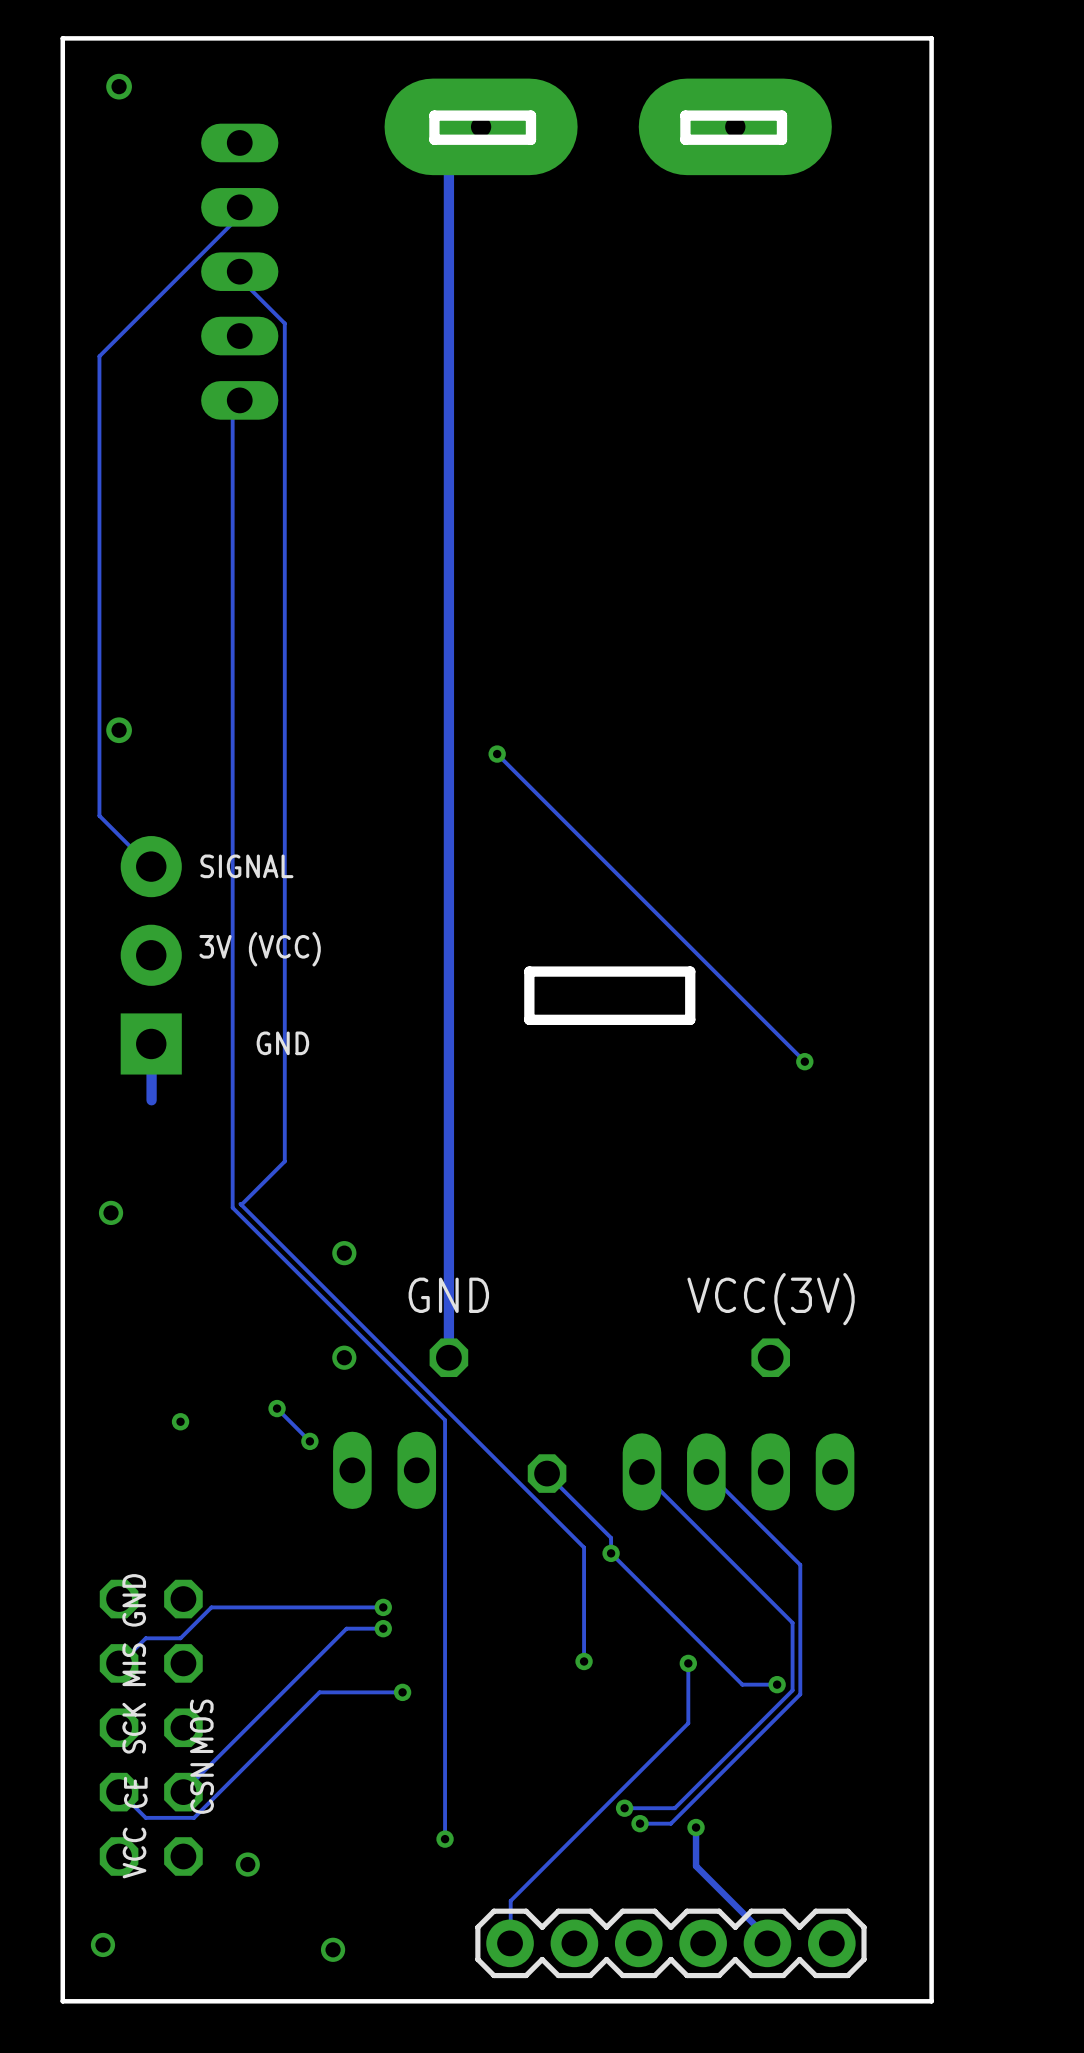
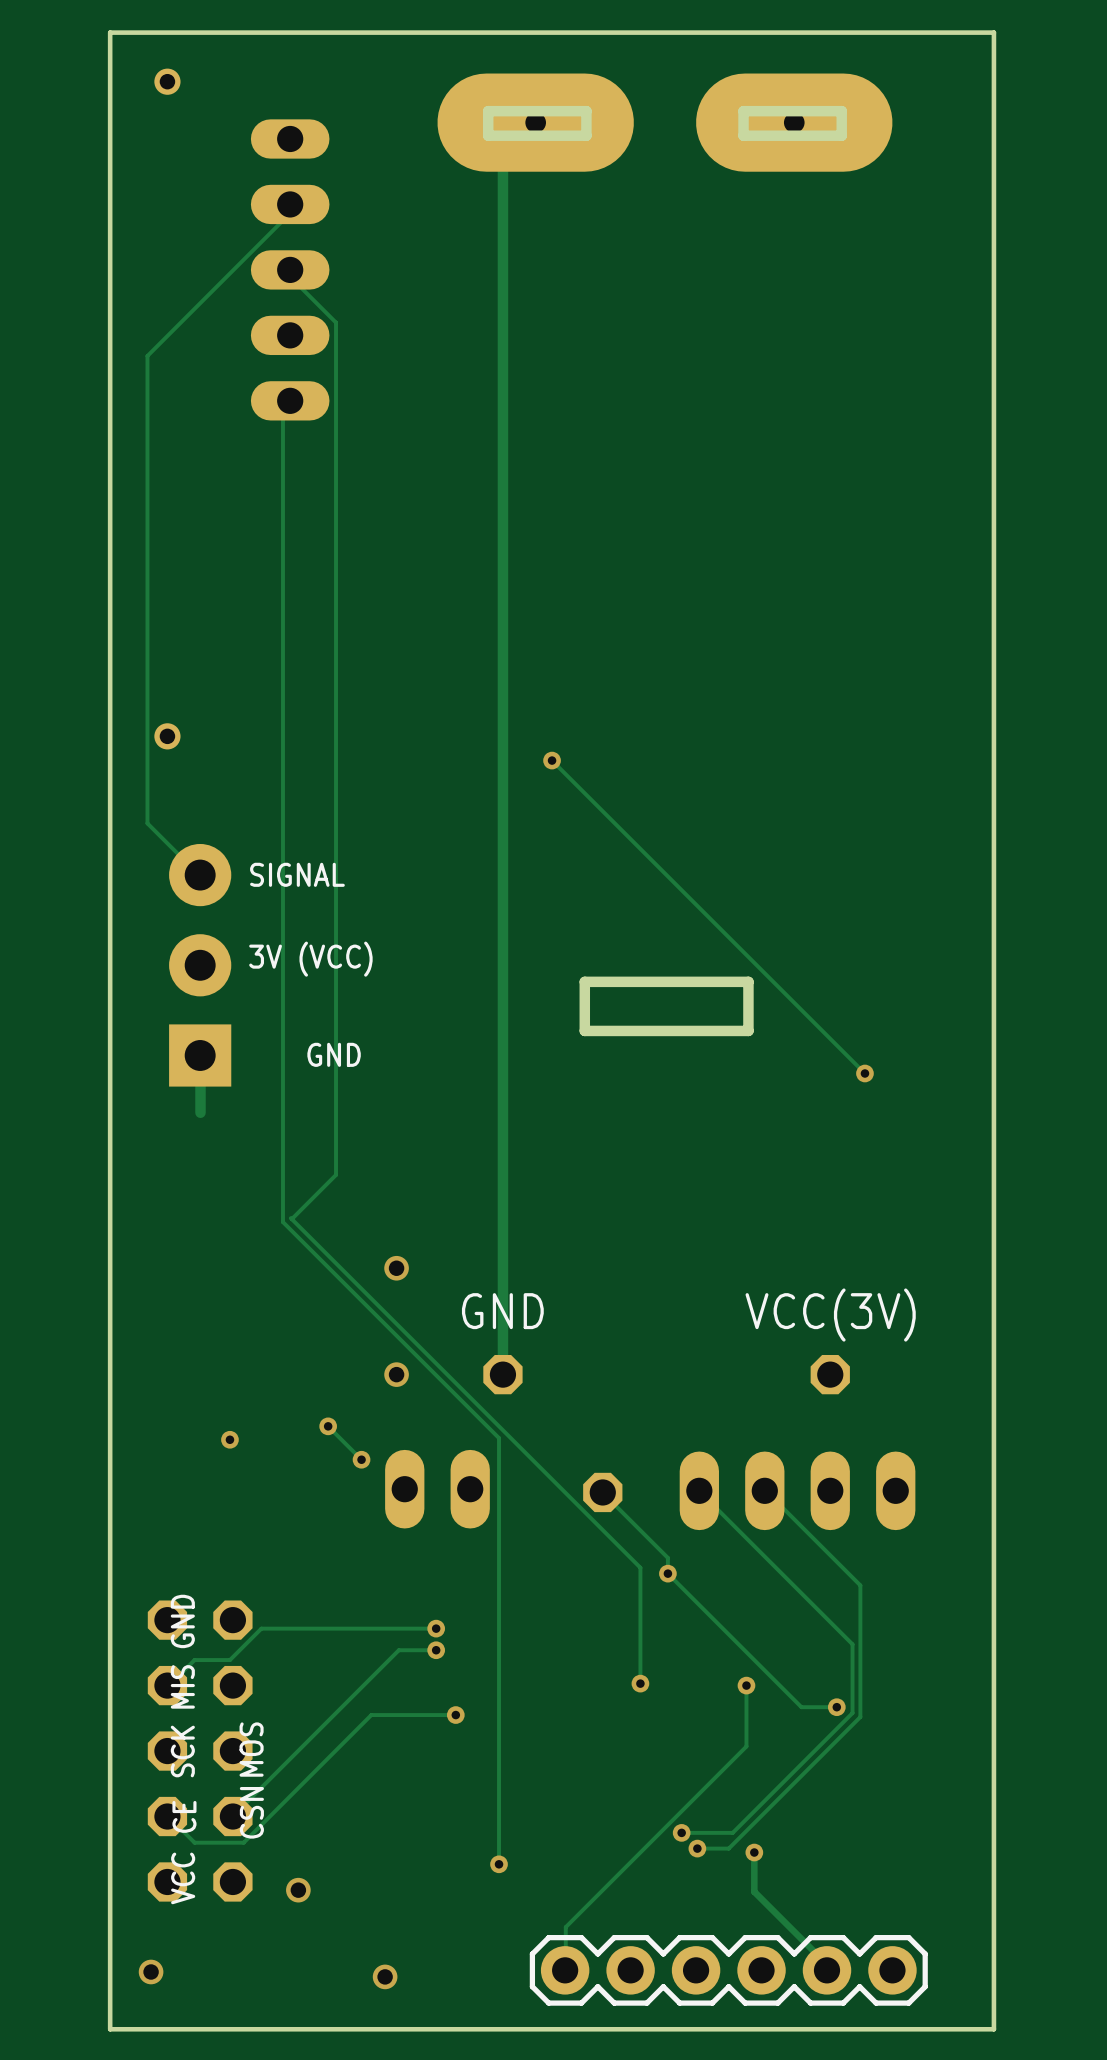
via: (111, 1212) -> none

